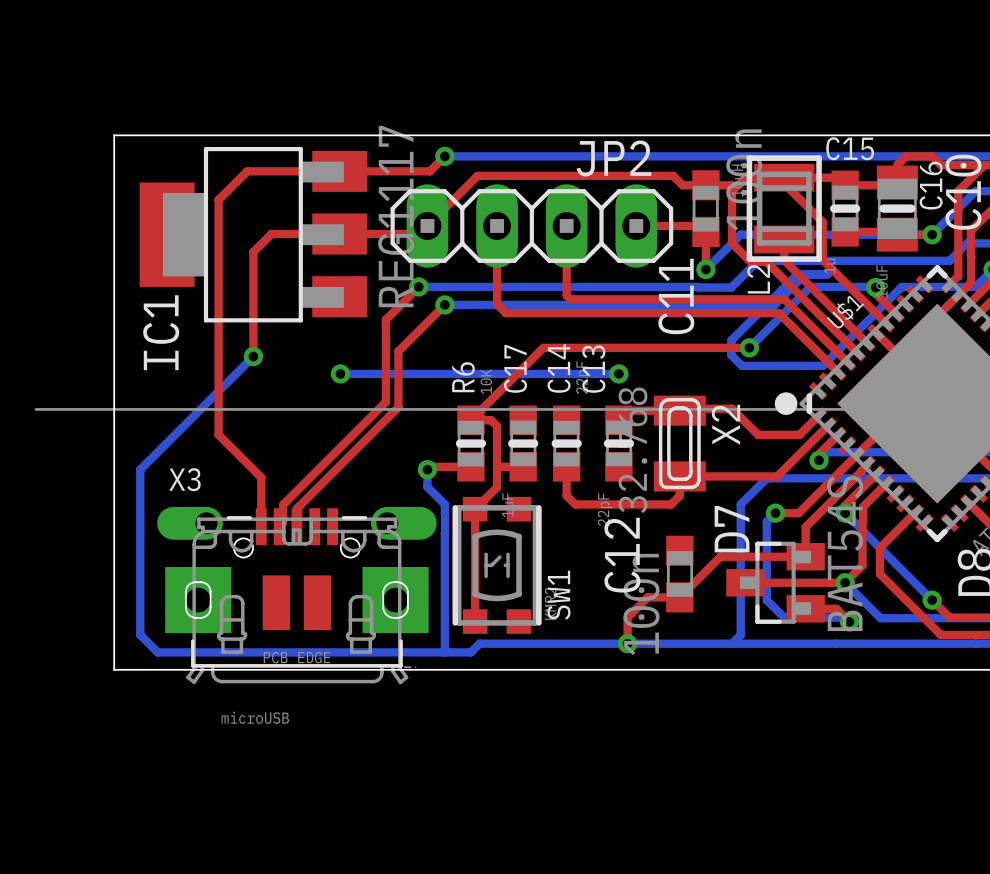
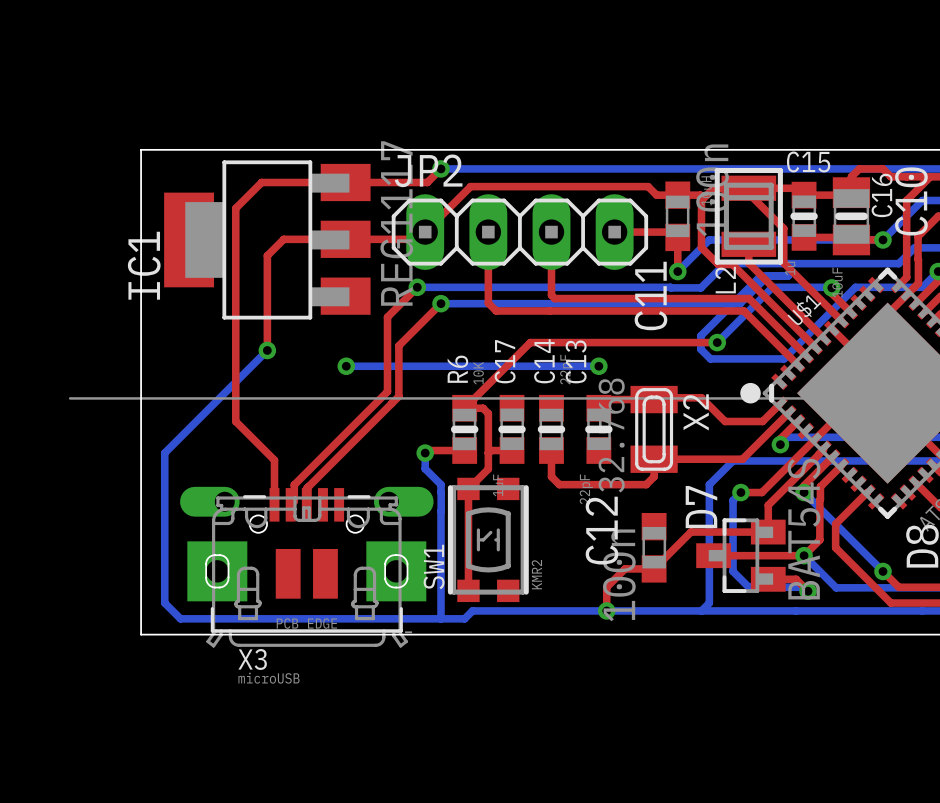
JP2 name position: JP2 (613, 158) -> JP2 (428, 170)
IC1 name position: IC1 (161, 332) -> IC1 (144, 265)
X3 name position: X3 (185, 479) -> X3 (252, 659)
SW1 name position: SW1 (559, 595) -> SW1 (434, 566)

